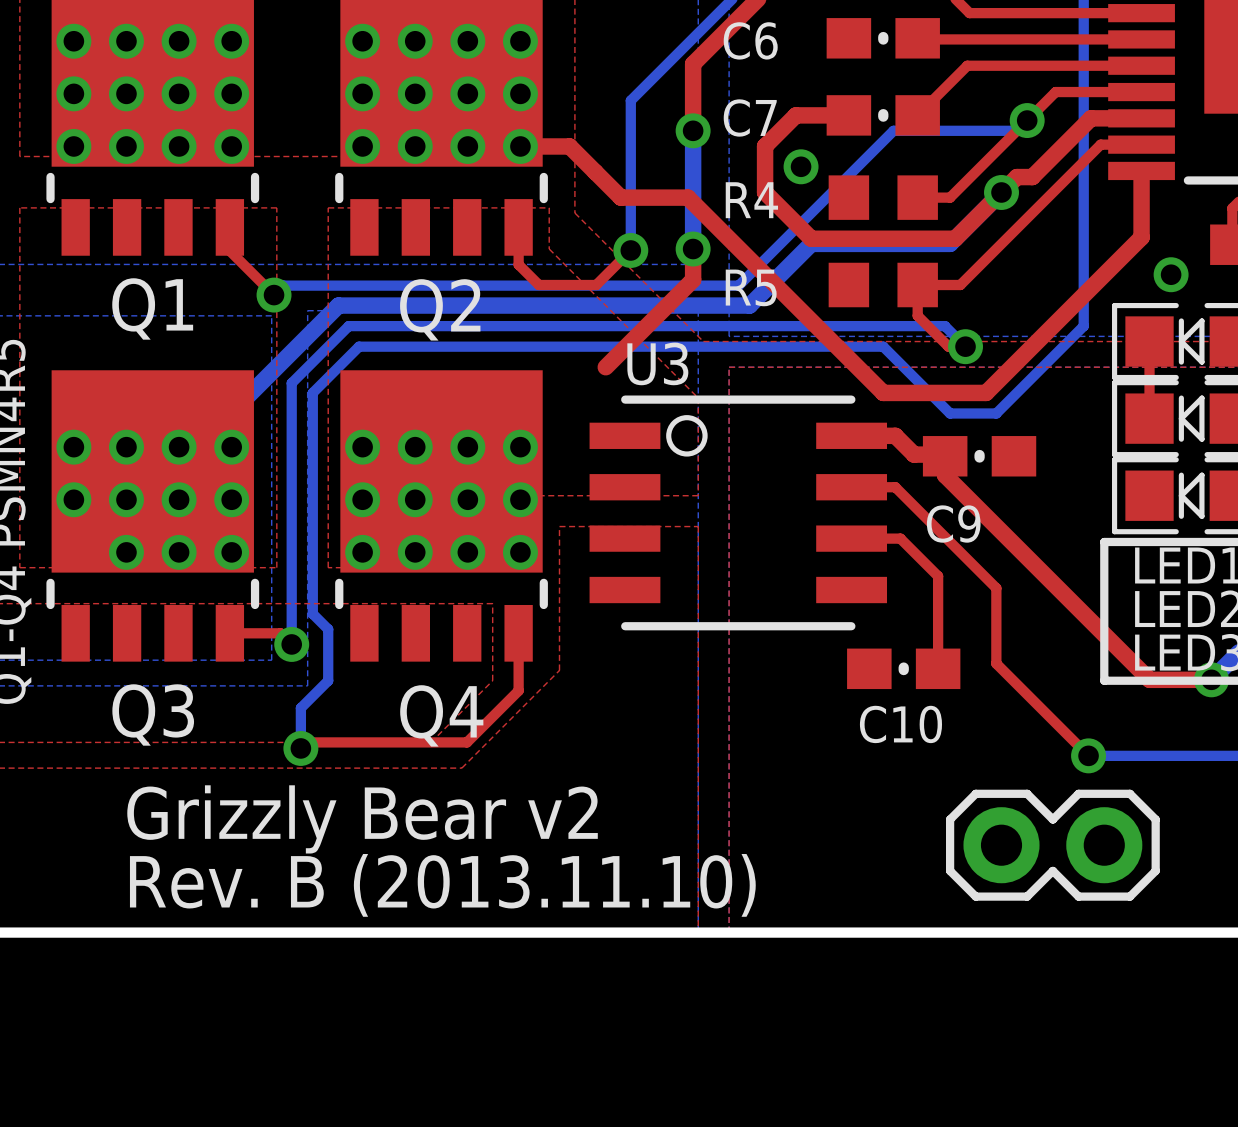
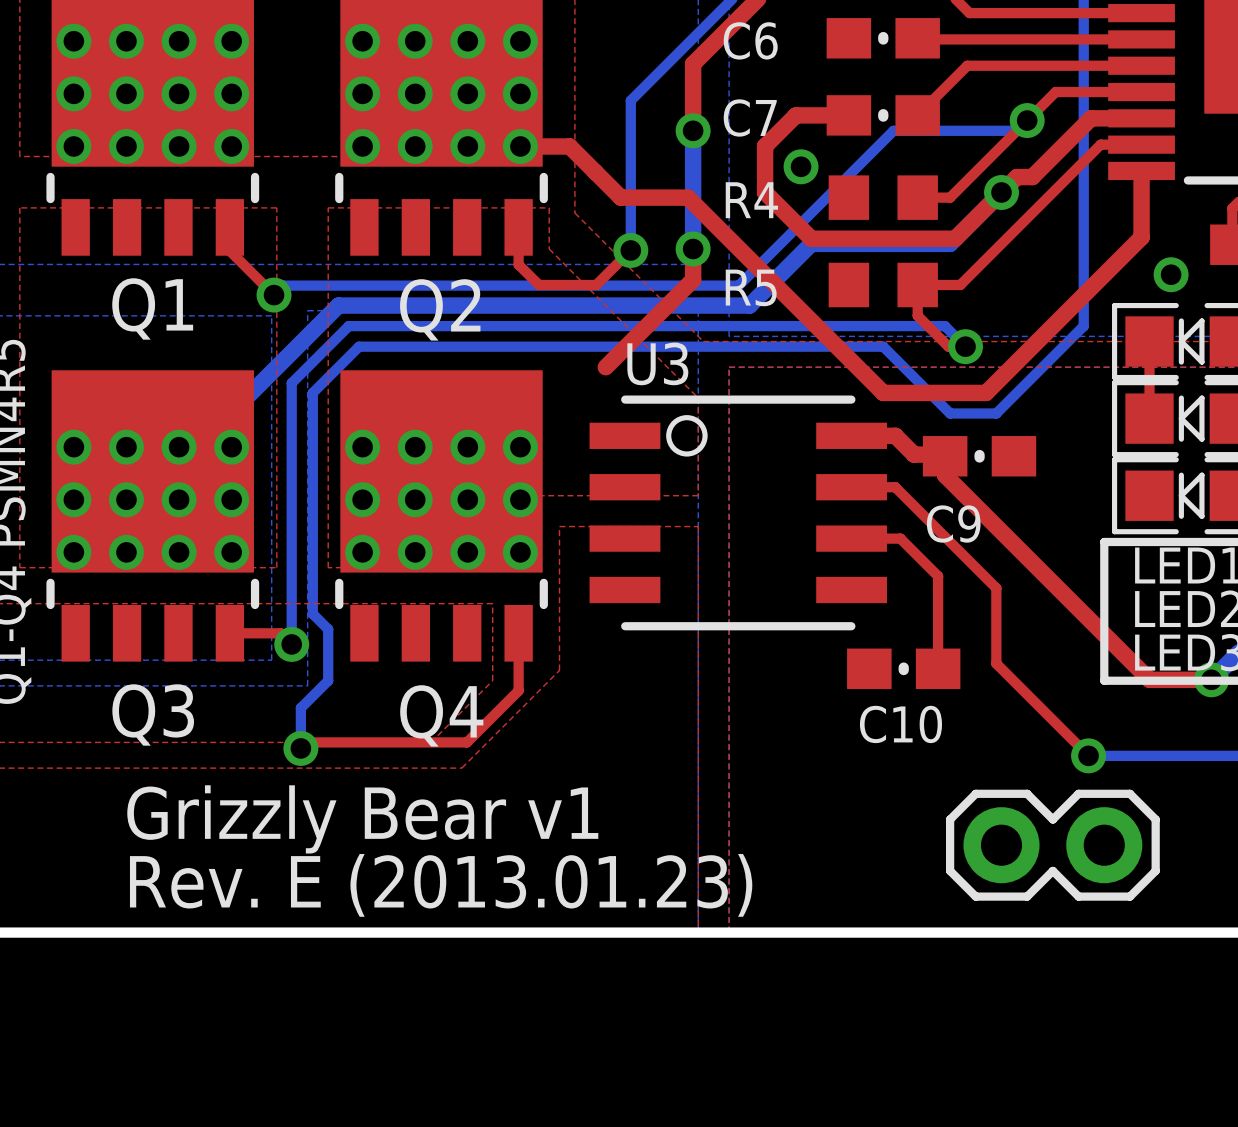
via: none -> (73, 552)
text: Grizzly Bear v2 (362, 819) -> Grizzly Bear v1 (362, 819)
text: Rev. B (2013.11.10) (442, 885) -> Rev. E (2013.01.23) (441, 885)

